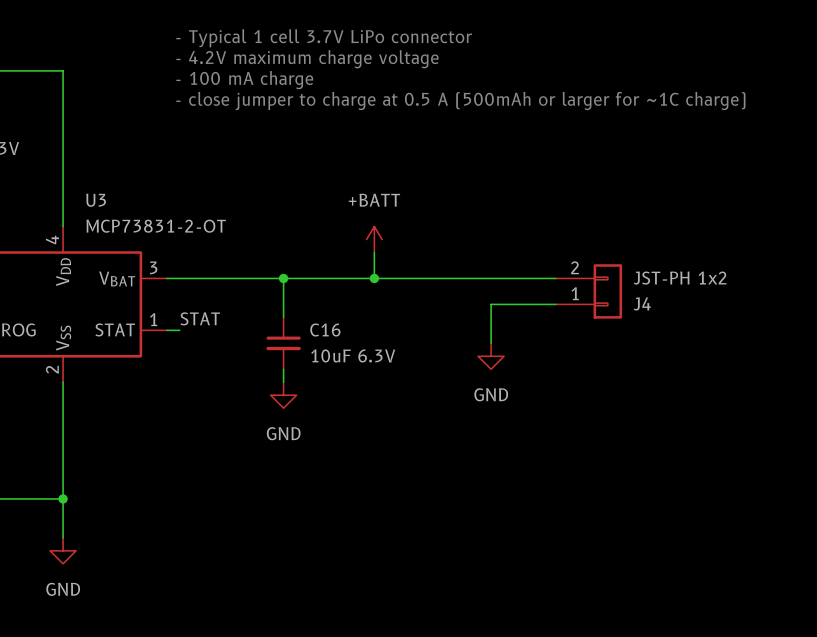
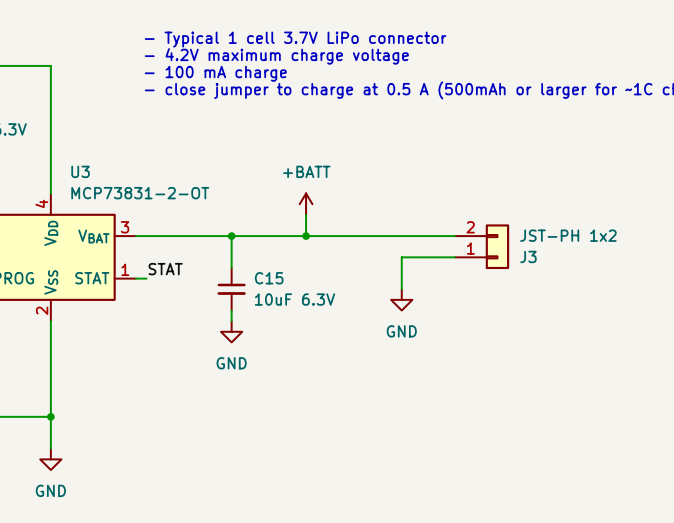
J4 name: J4 (642, 304) -> J3 (528, 256)
C16 name: C16 (325, 330) -> C15 (269, 278)

